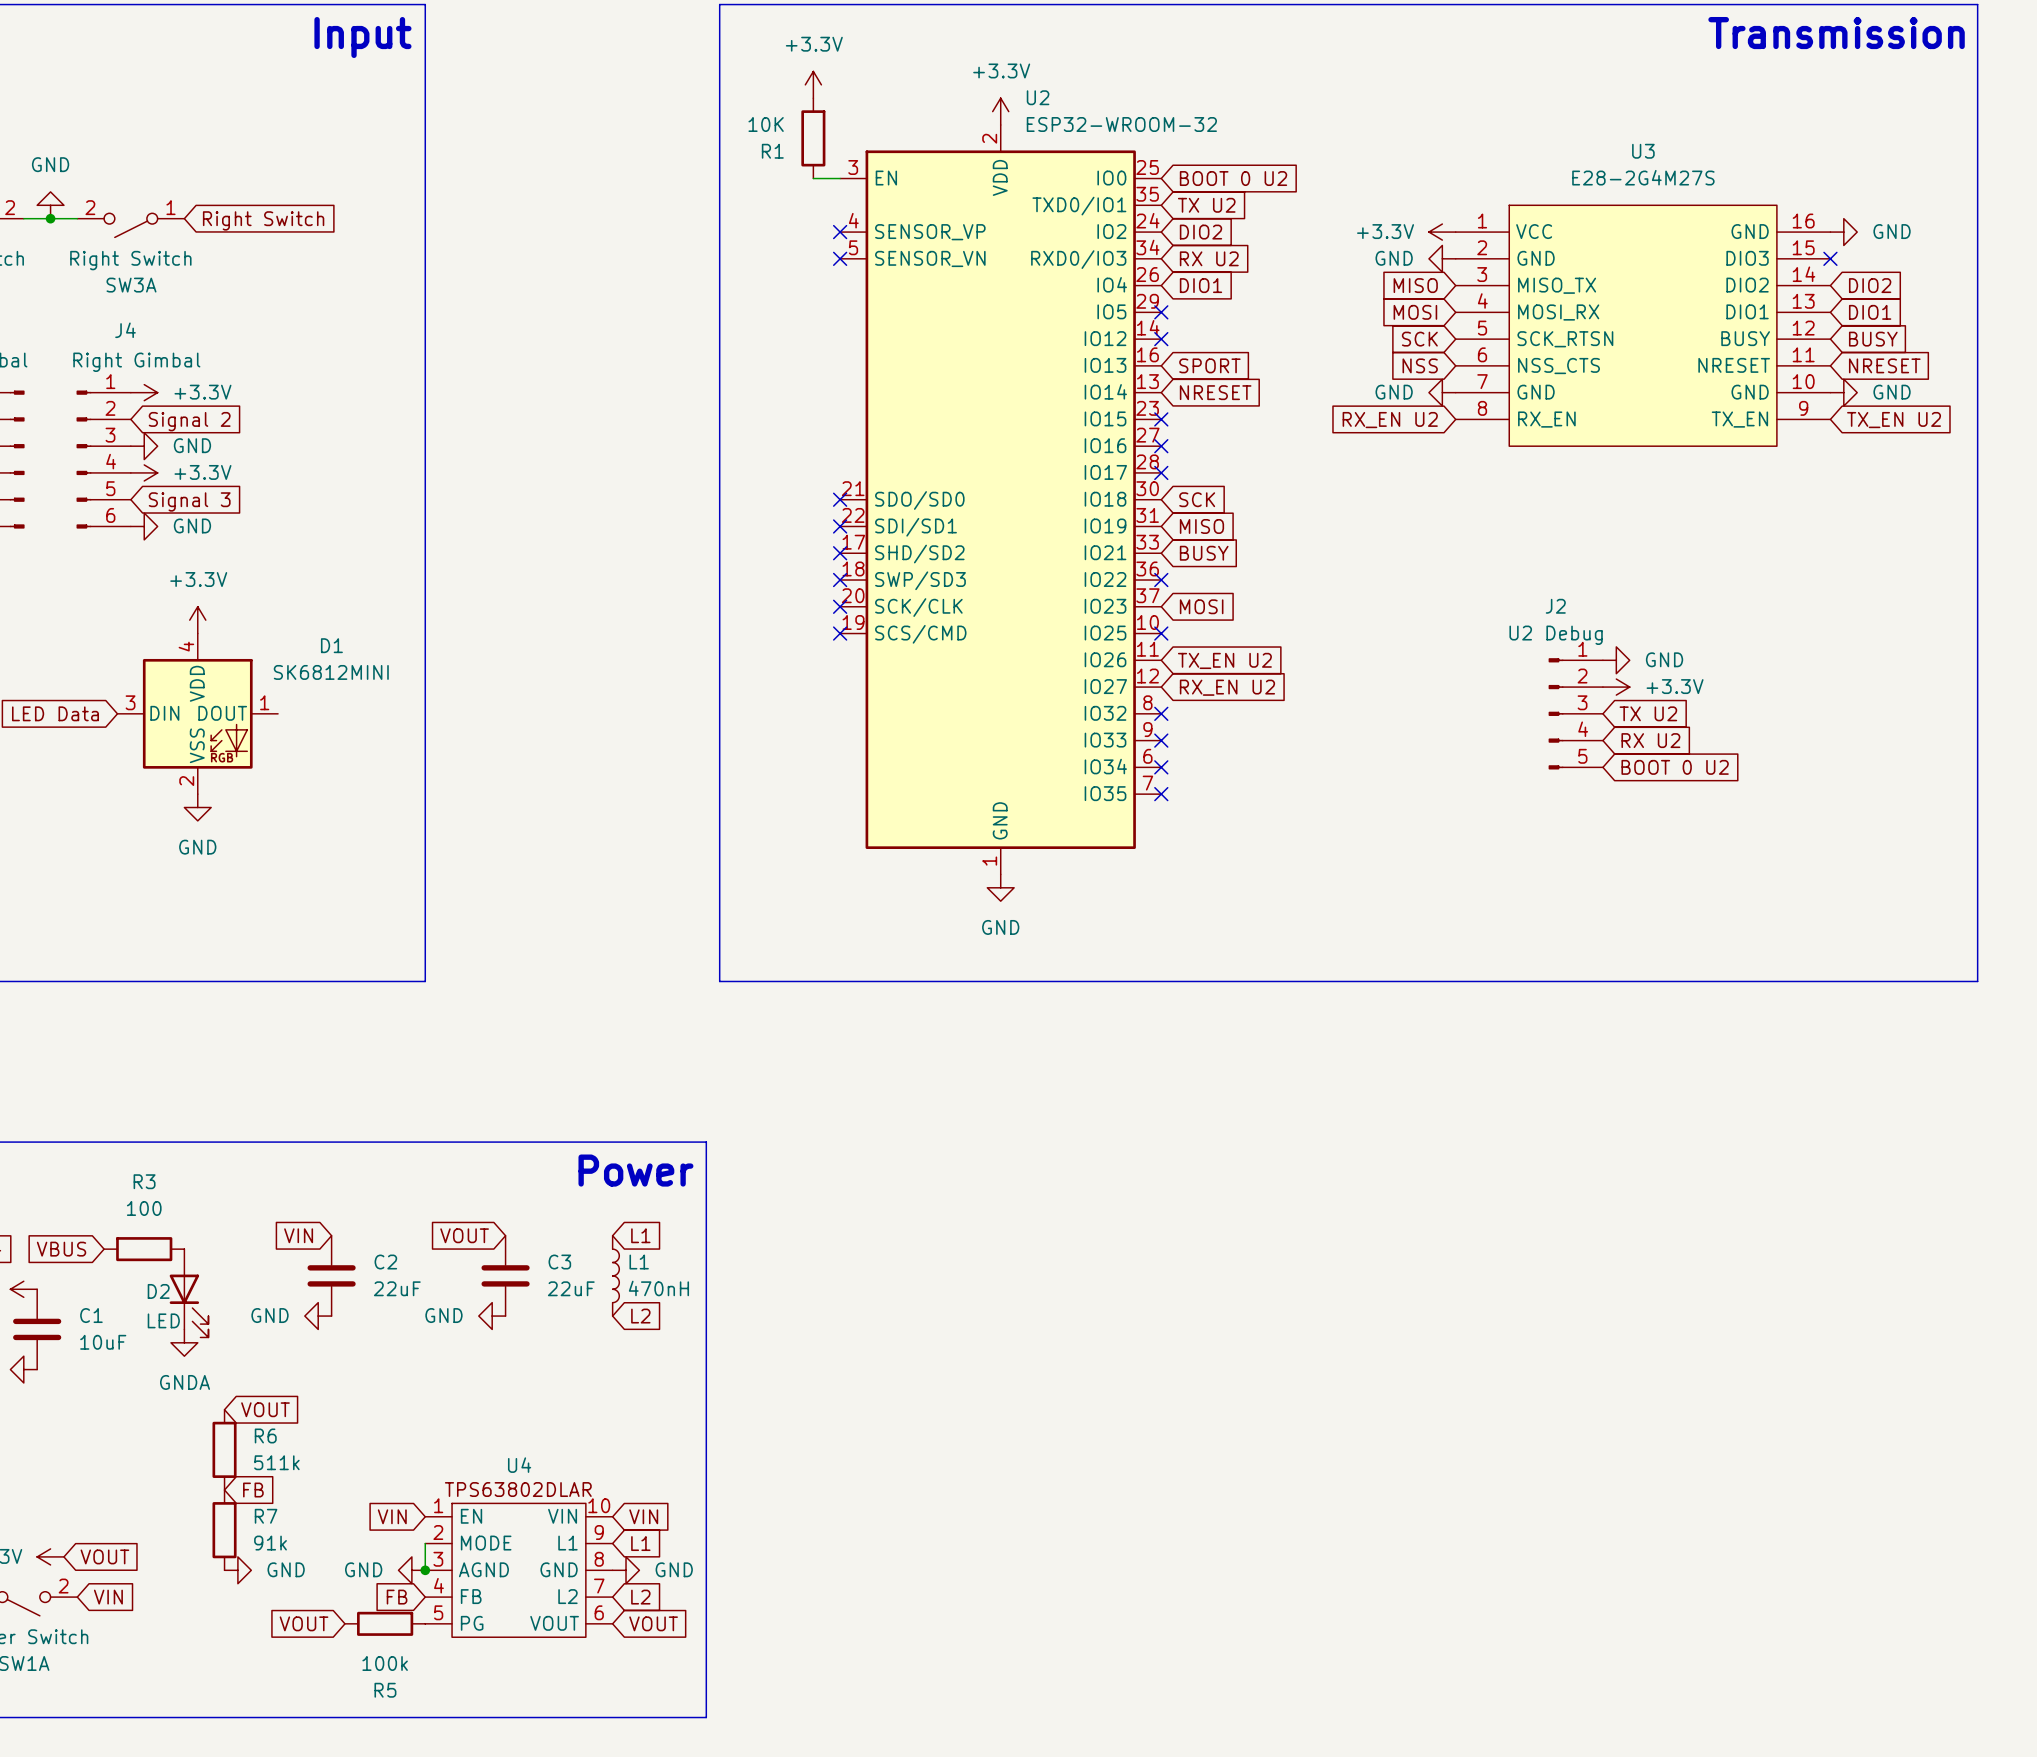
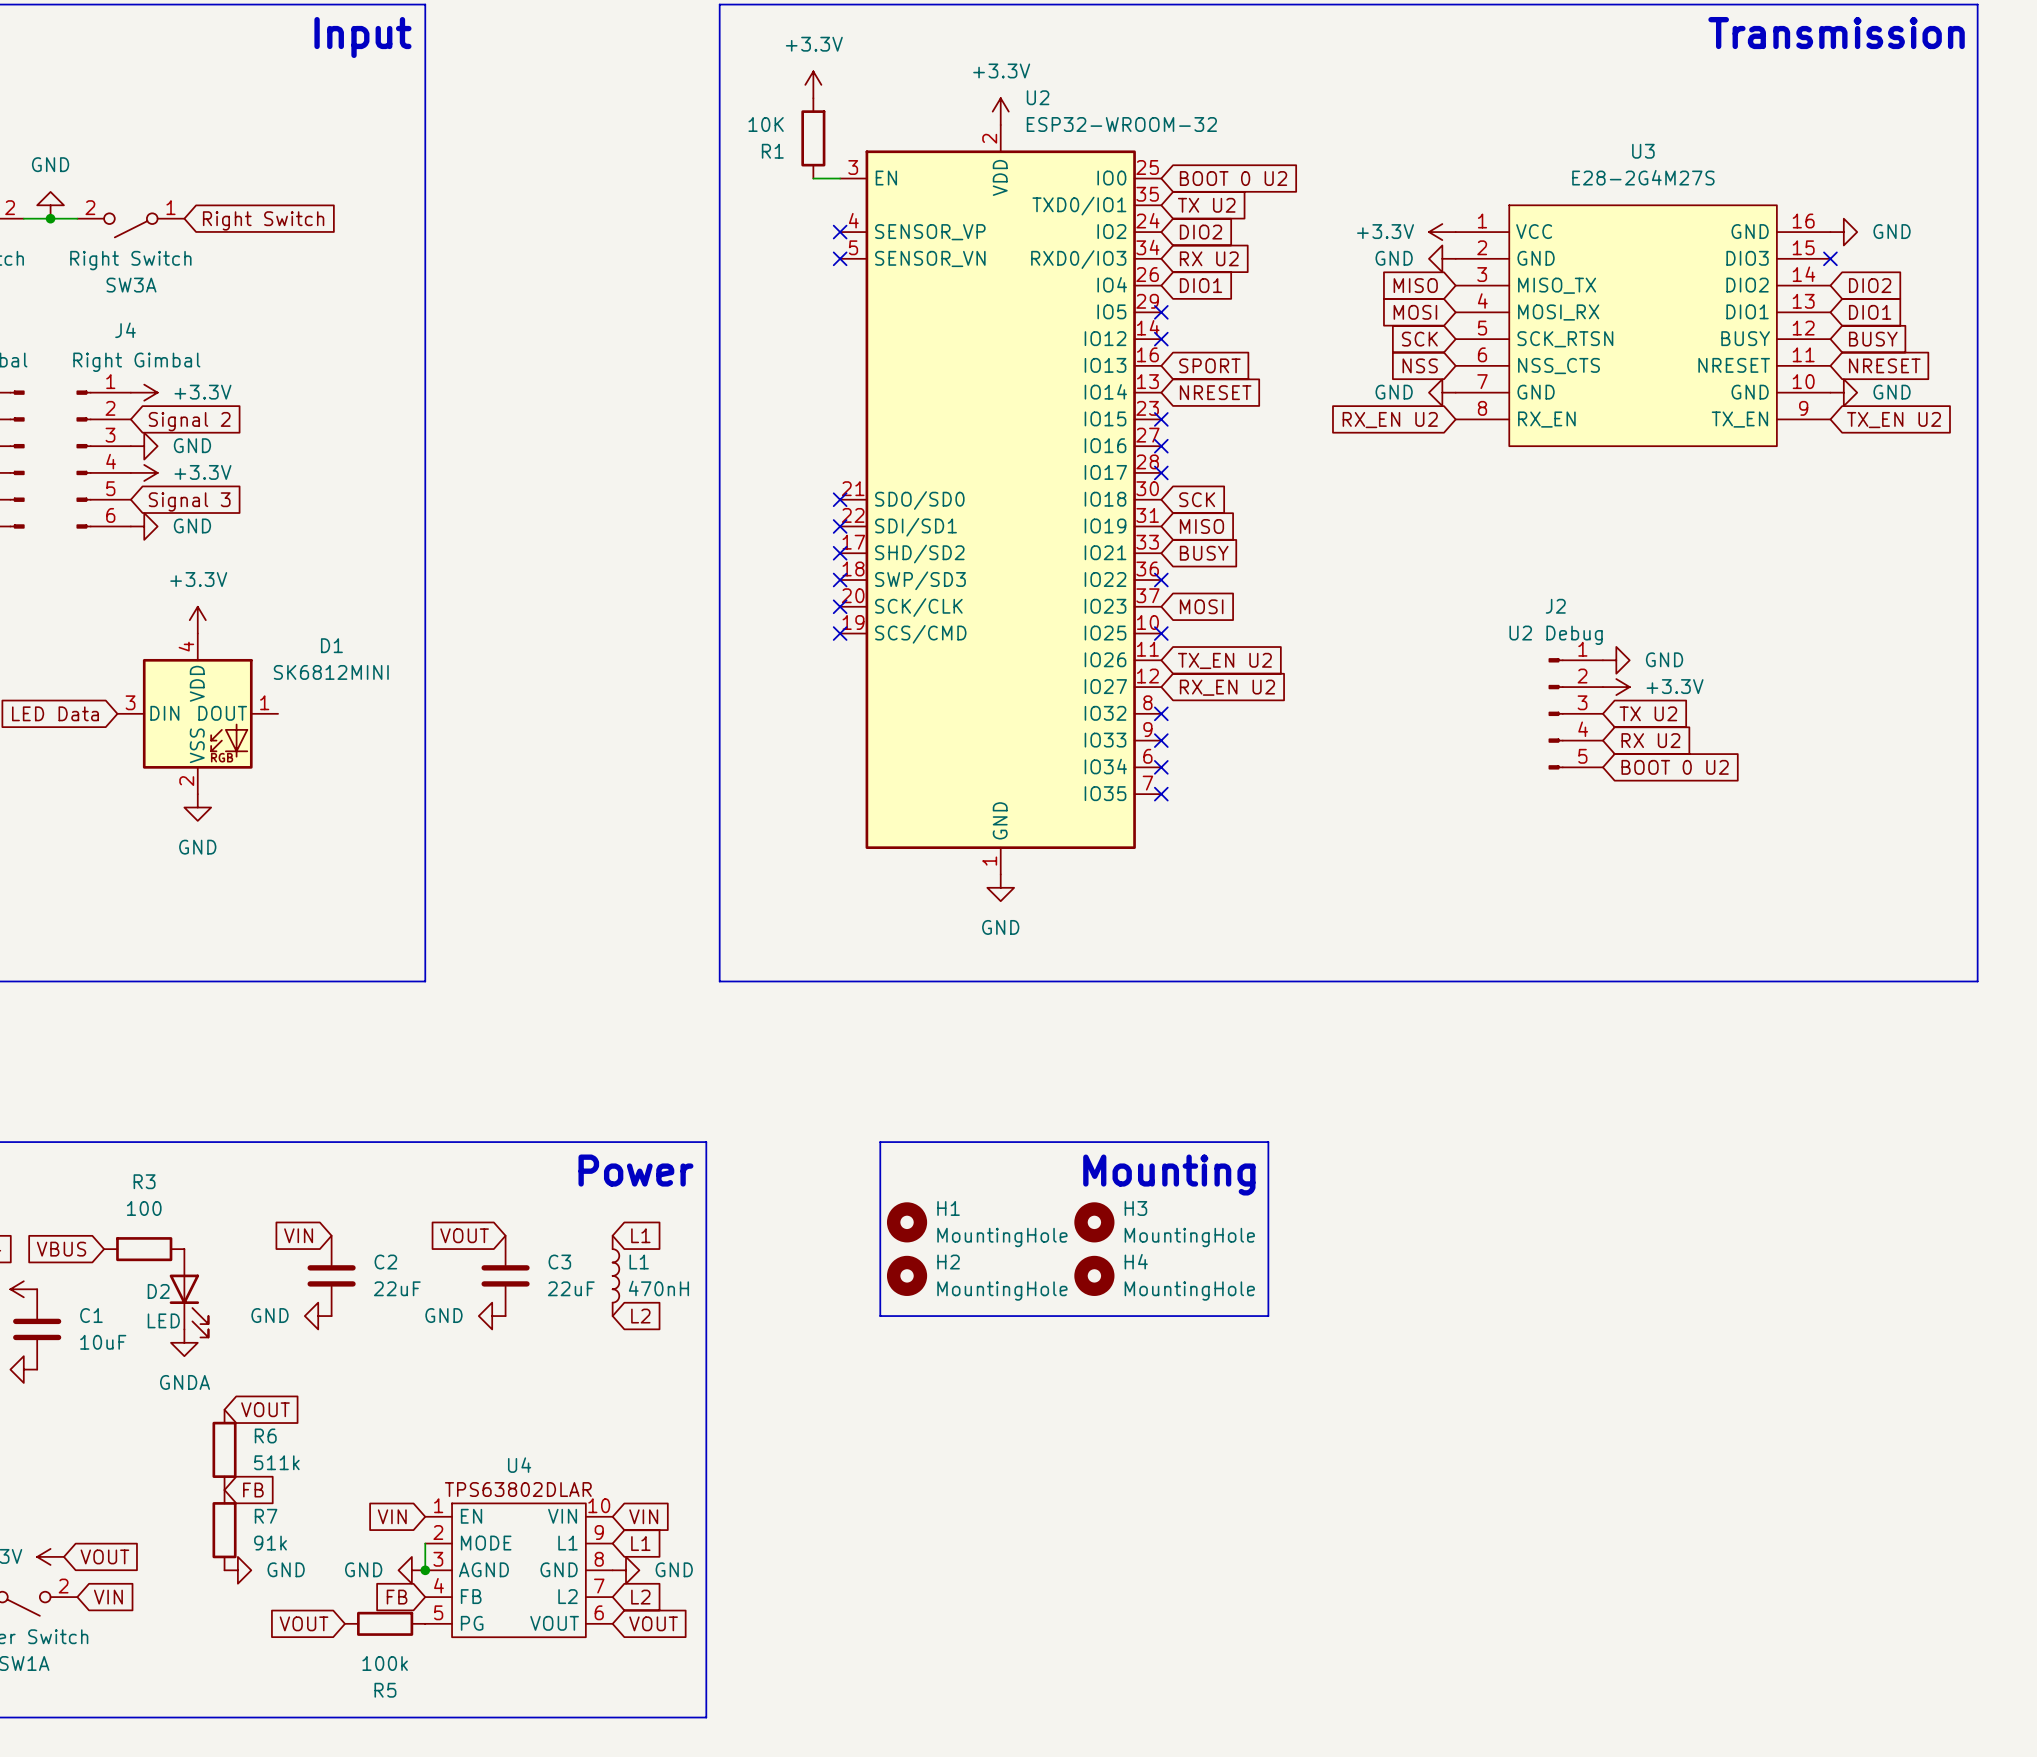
line: none -> (880, 1142) (1268, 1142) (1268, 1316) (880, 1316) (880, 1142)
text: none -> Mounting (1169, 1175)
H1: none -> MountingHole (907, 1222)
H3: none -> MountingHole (1094, 1222)
H2: none -> MountingHole (907, 1275)
H4: none -> MountingHole (1094, 1275)

